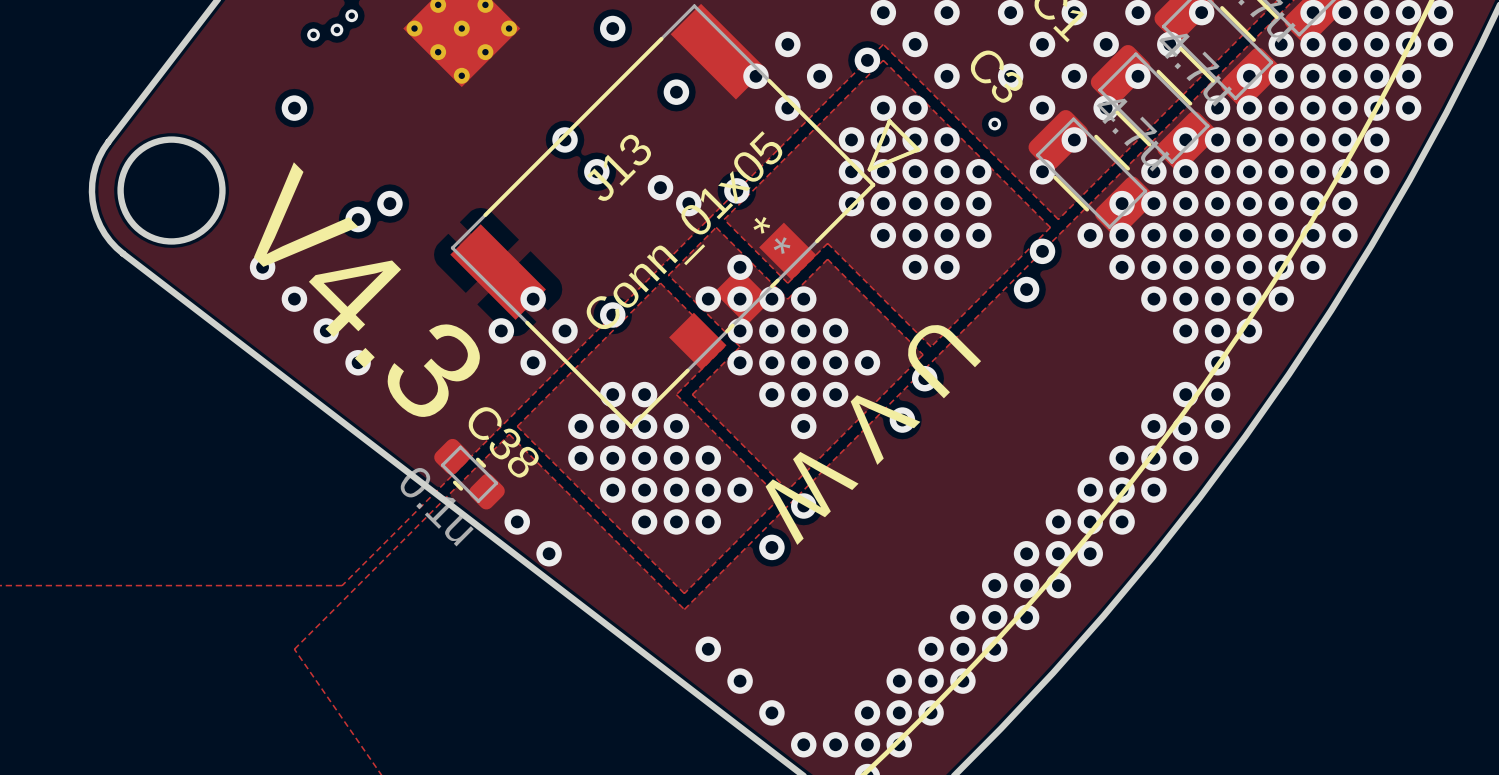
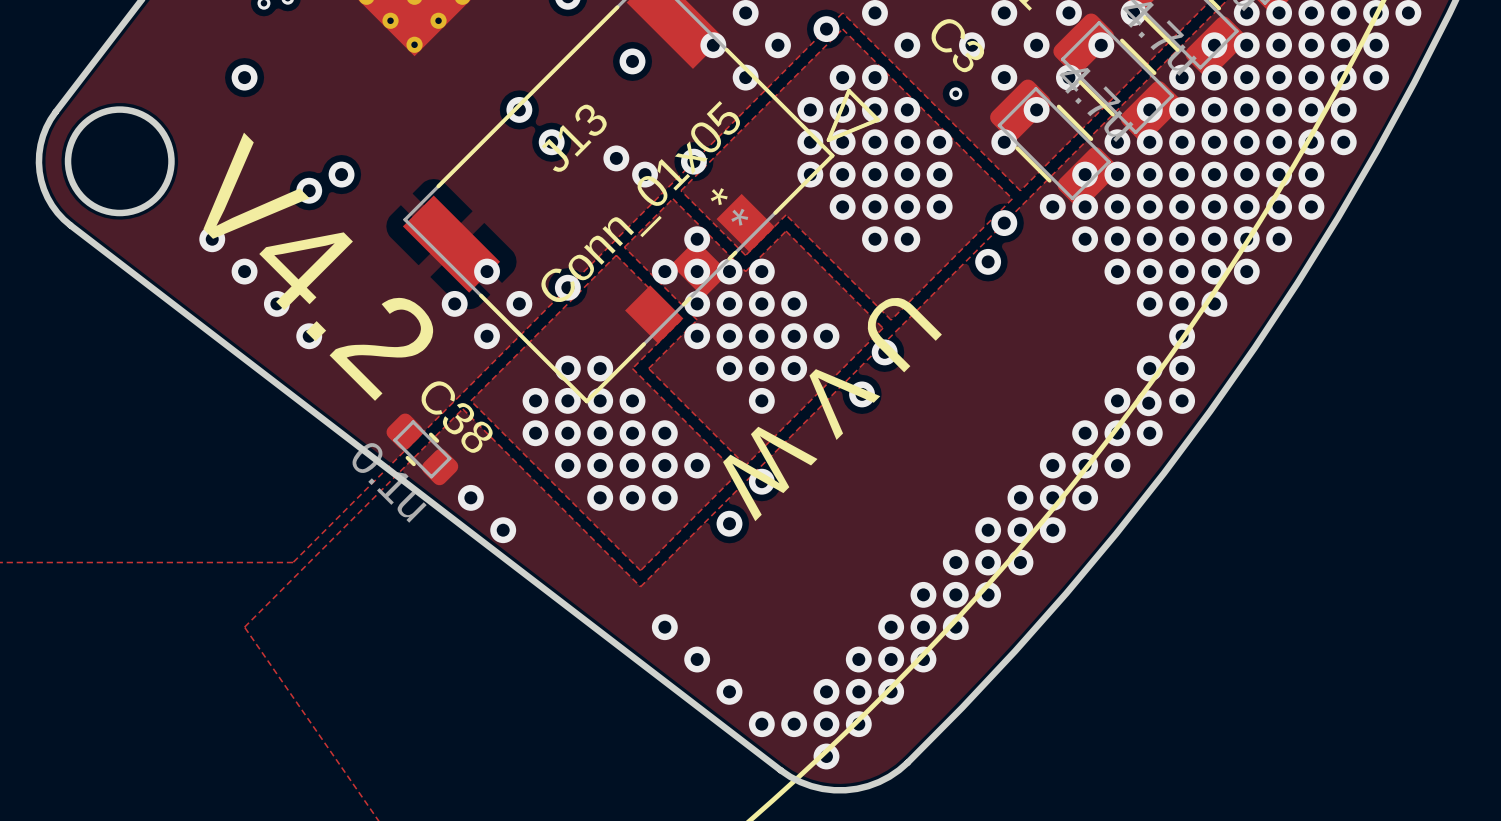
text: V4.3 (367, 289) -> V4.2 (318, 266)

